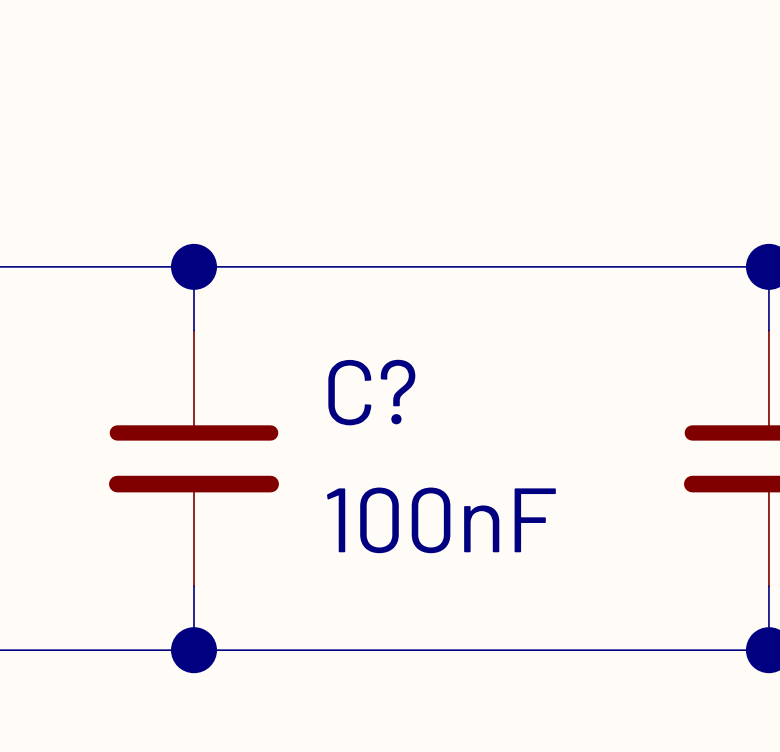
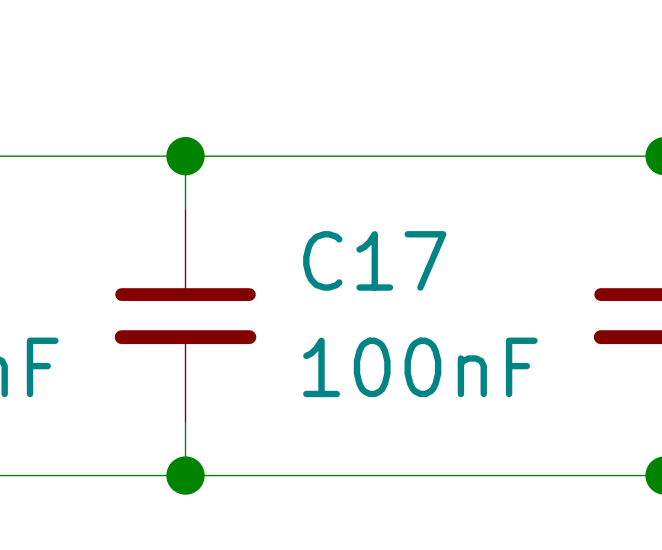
C? name: C? (371, 392) -> C17 (374, 260)

